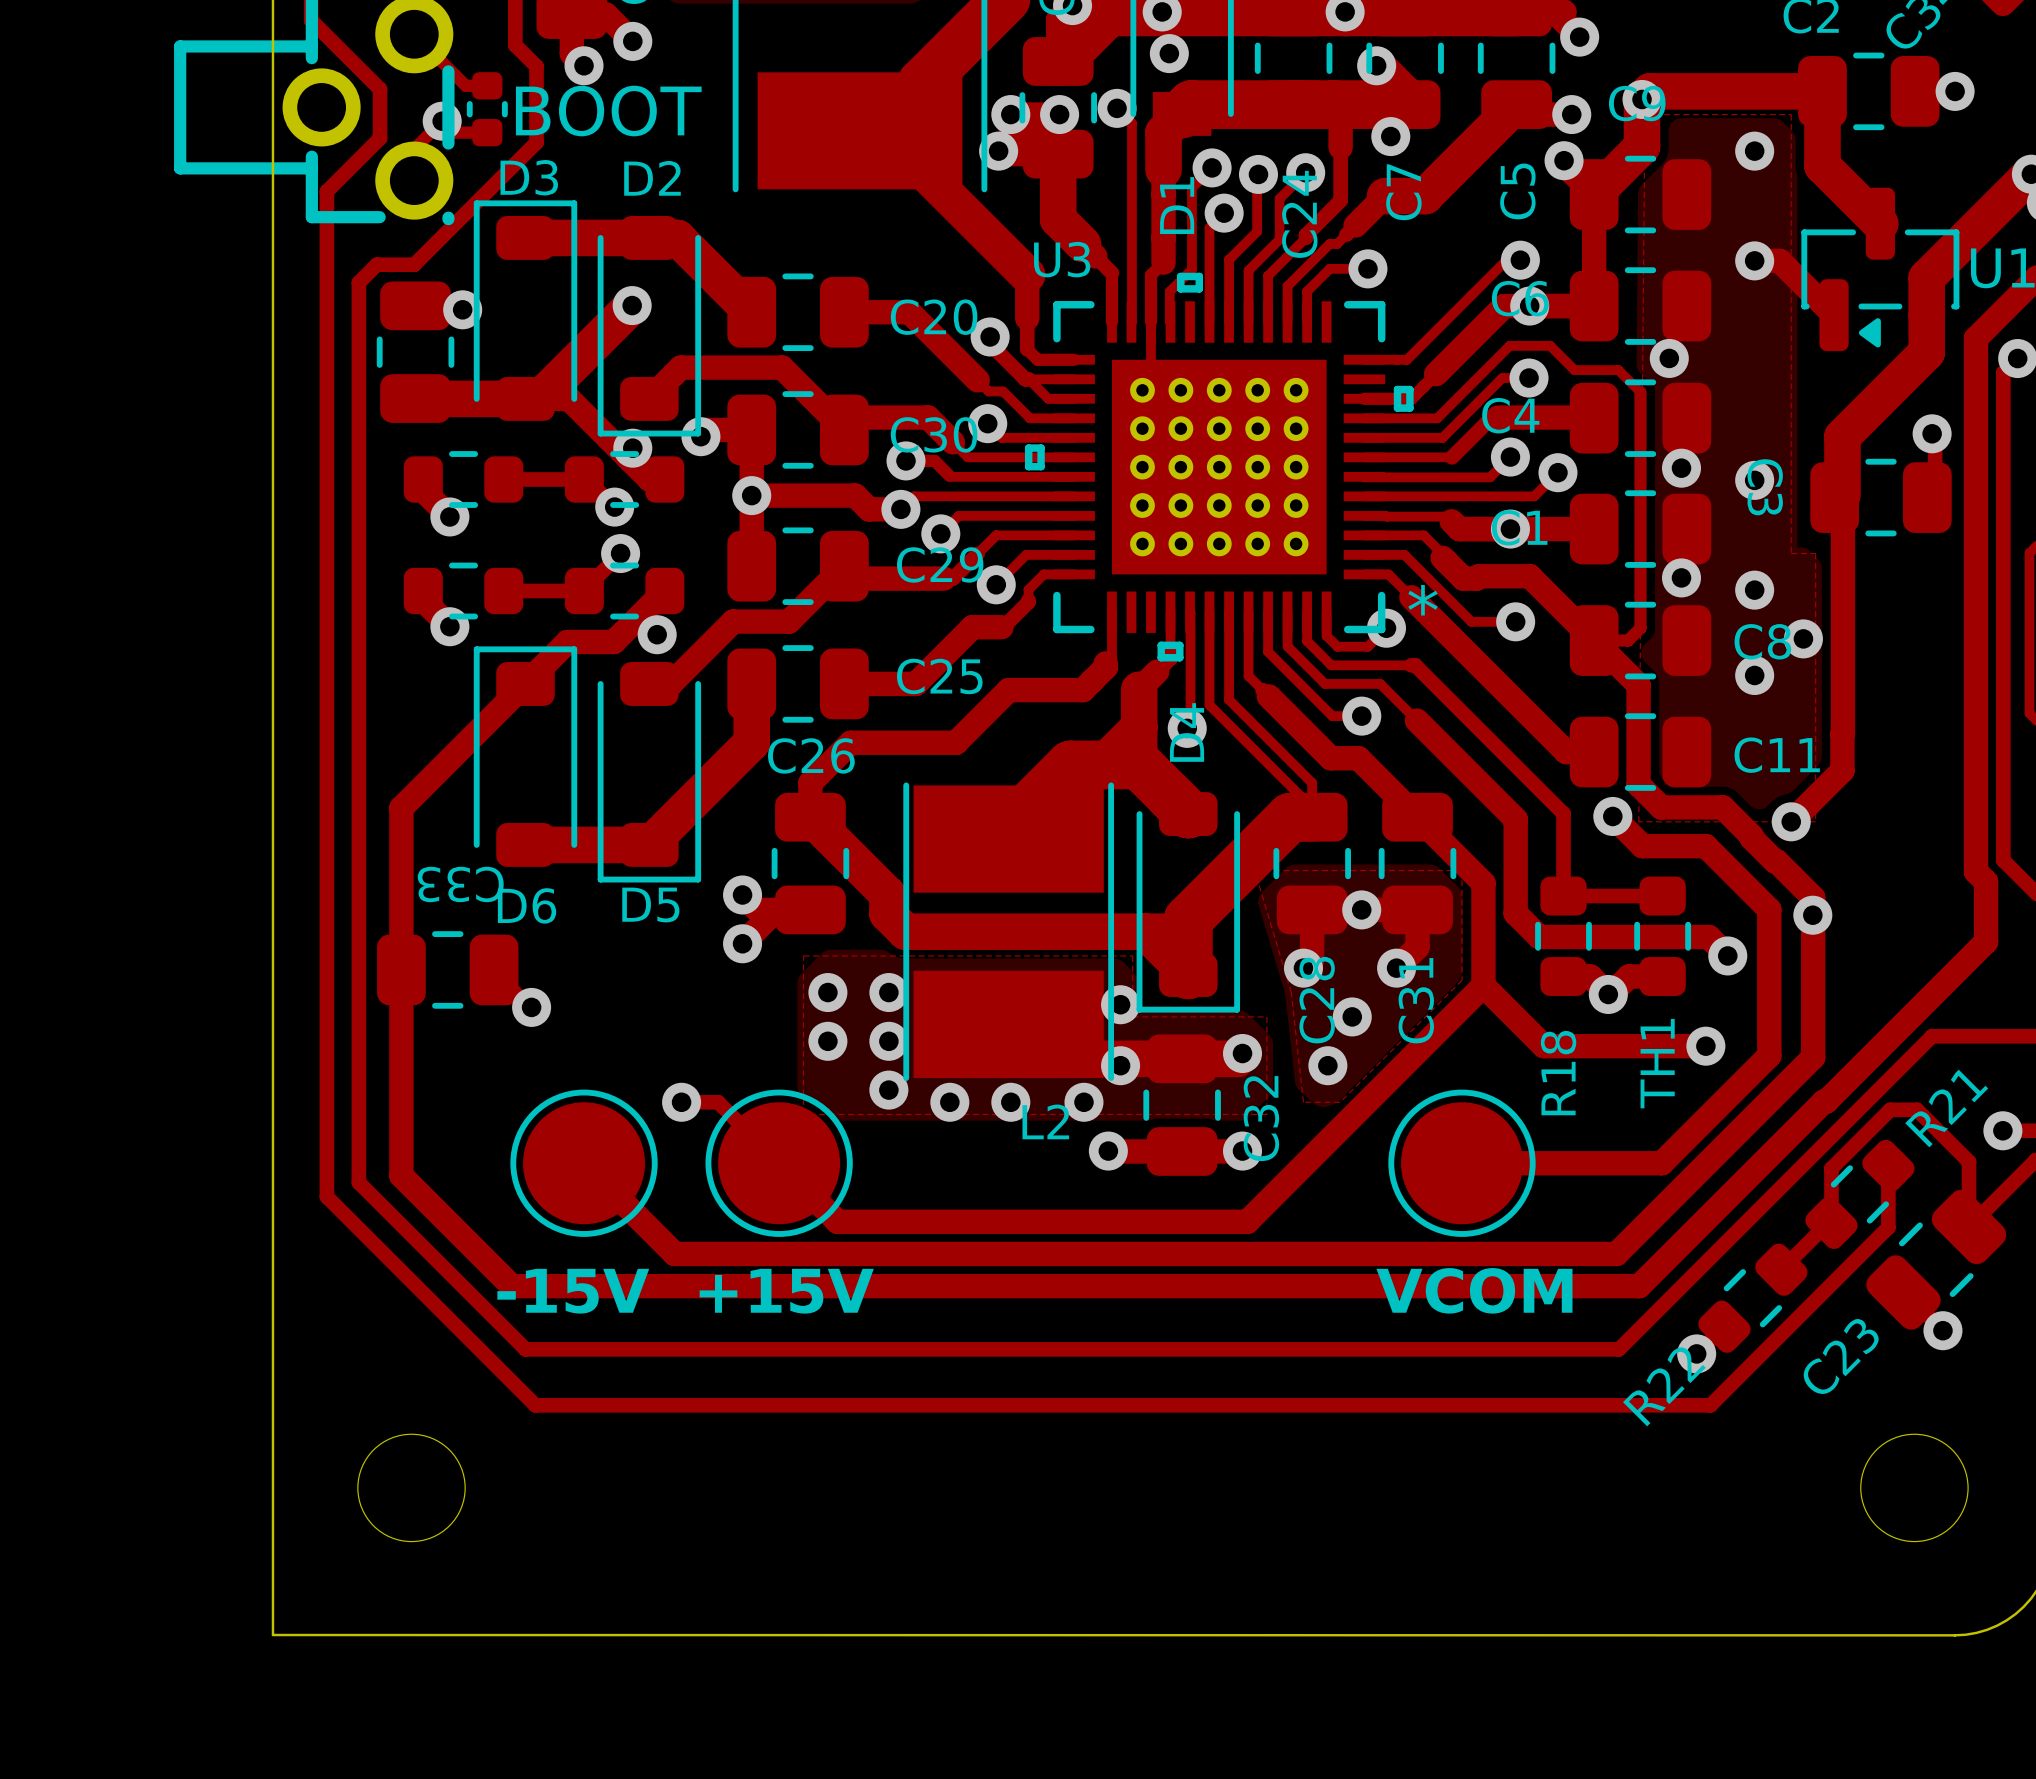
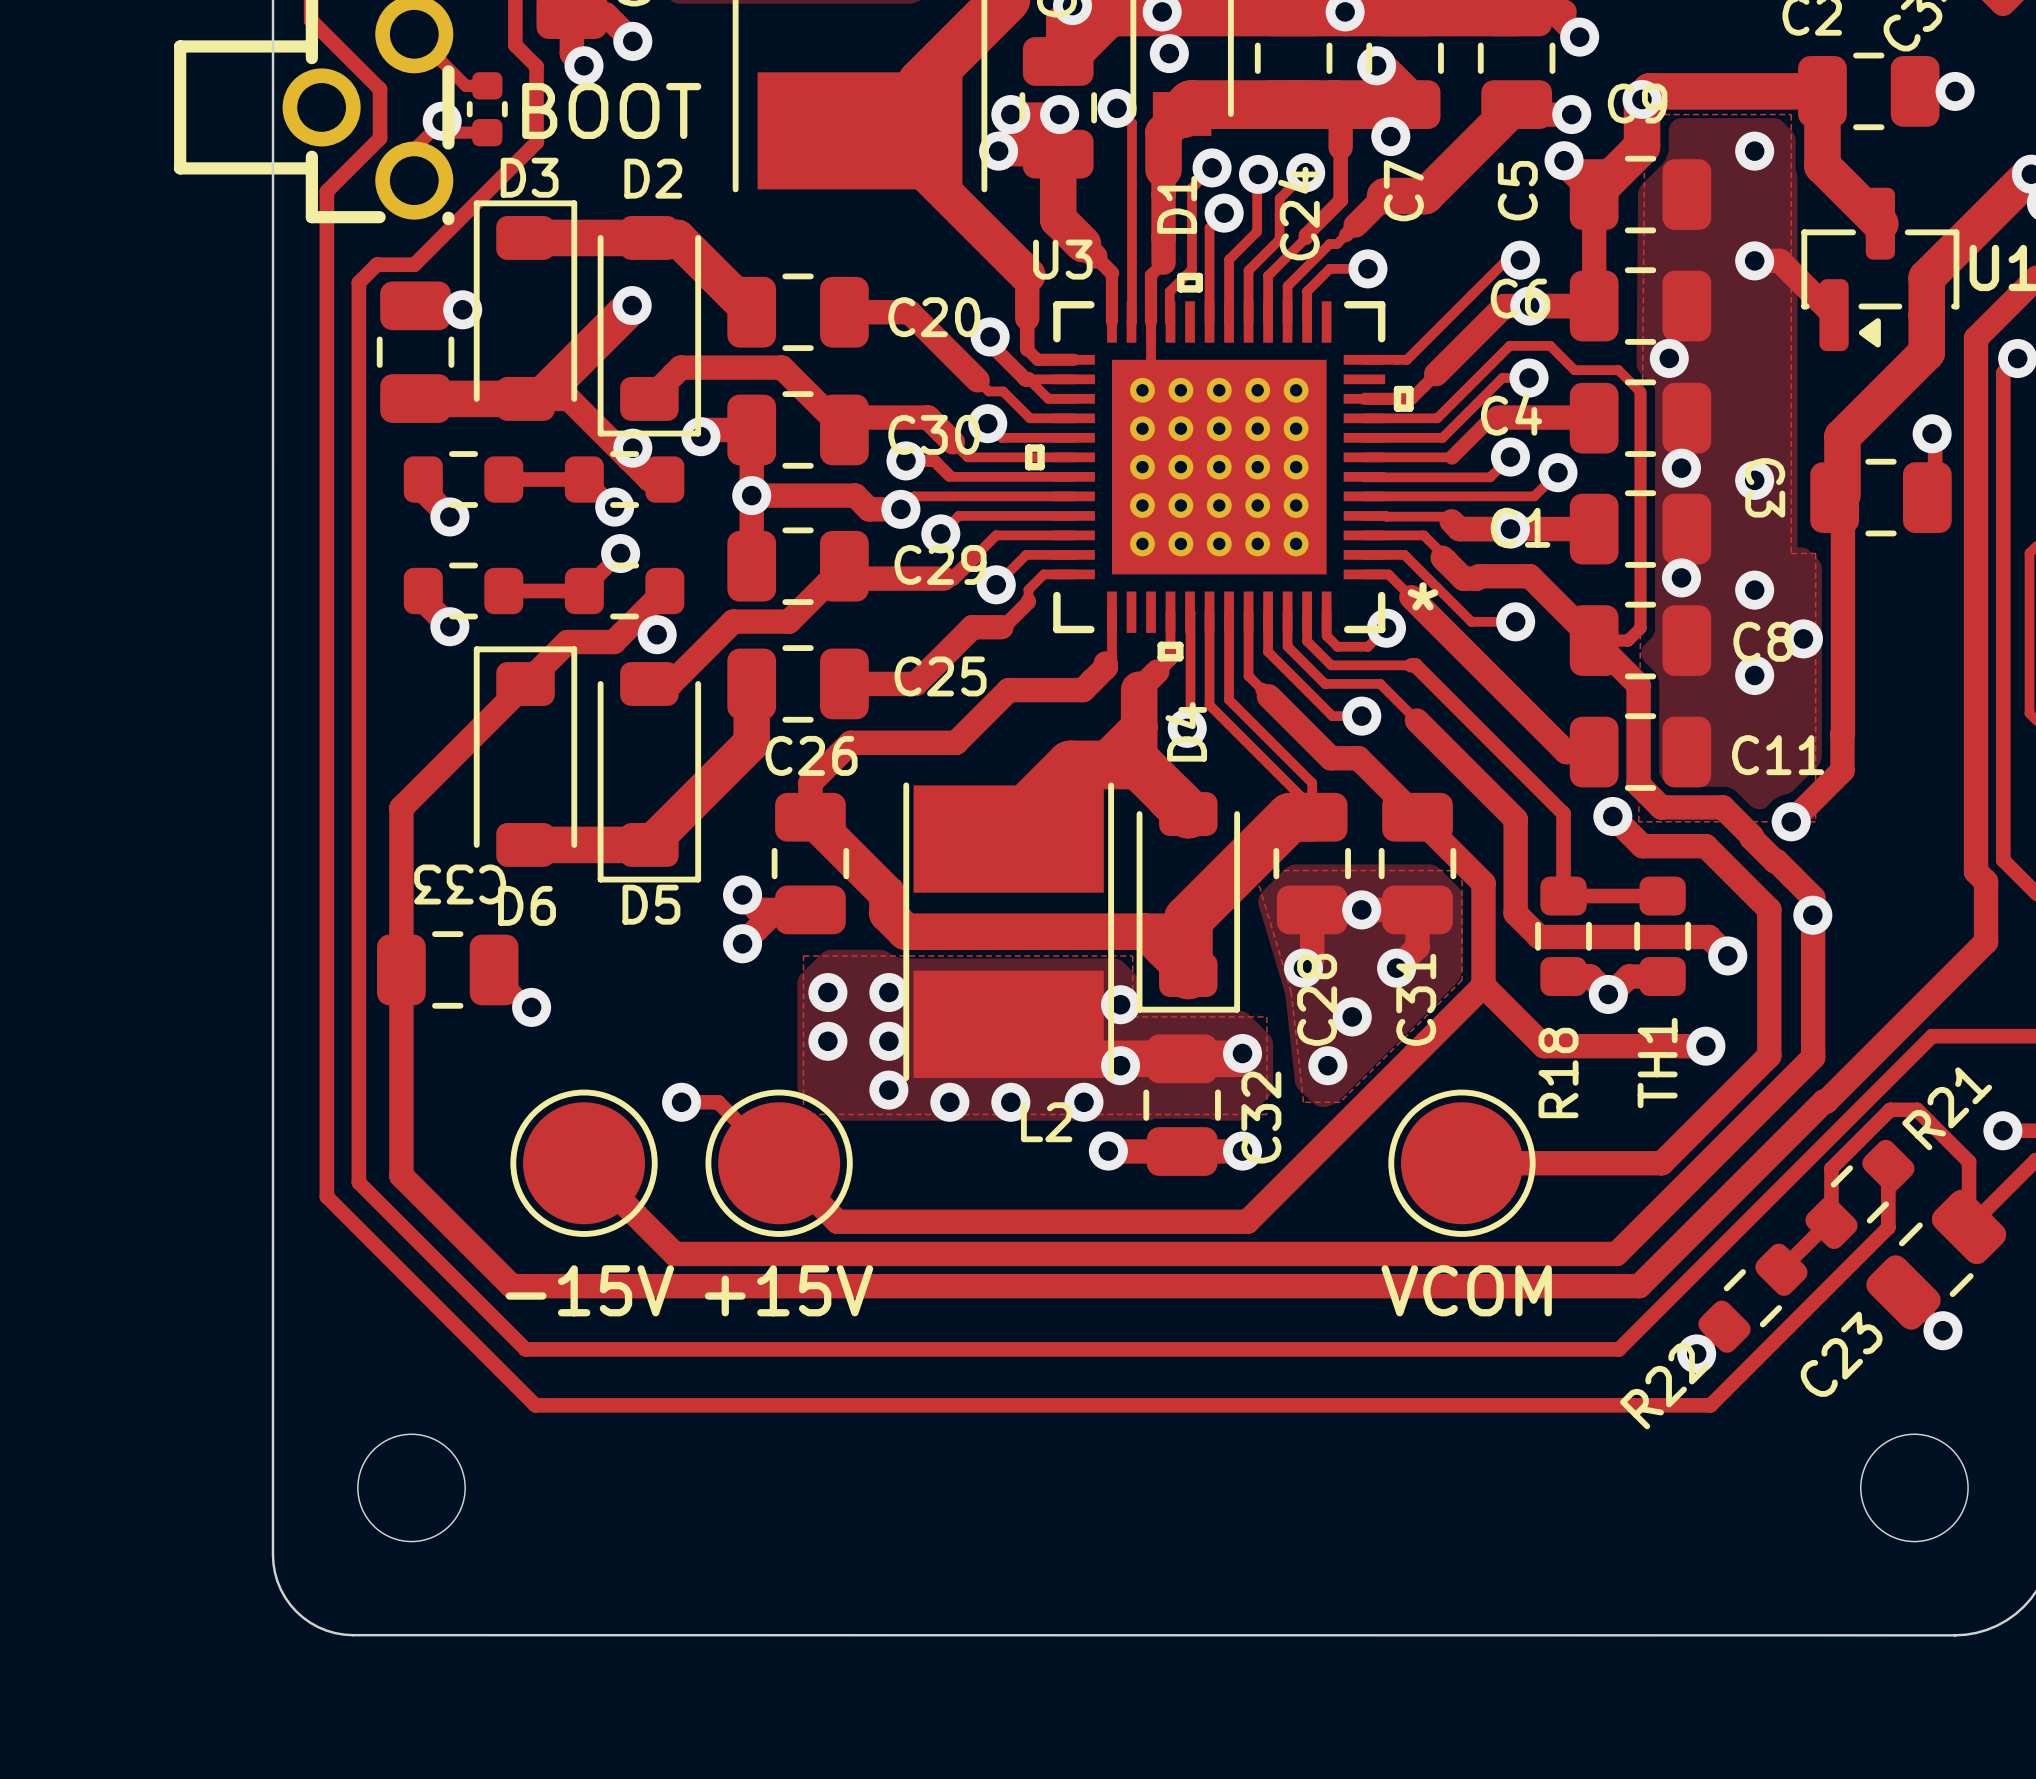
board edge: (272, 1554) (272, 1635) (1955, 1635) -> (272, 1554) (277, 1581) (285, 1597) (296, 1611) (318, 1627) (335, 1633) (353, 1635) (1955, 1635)

